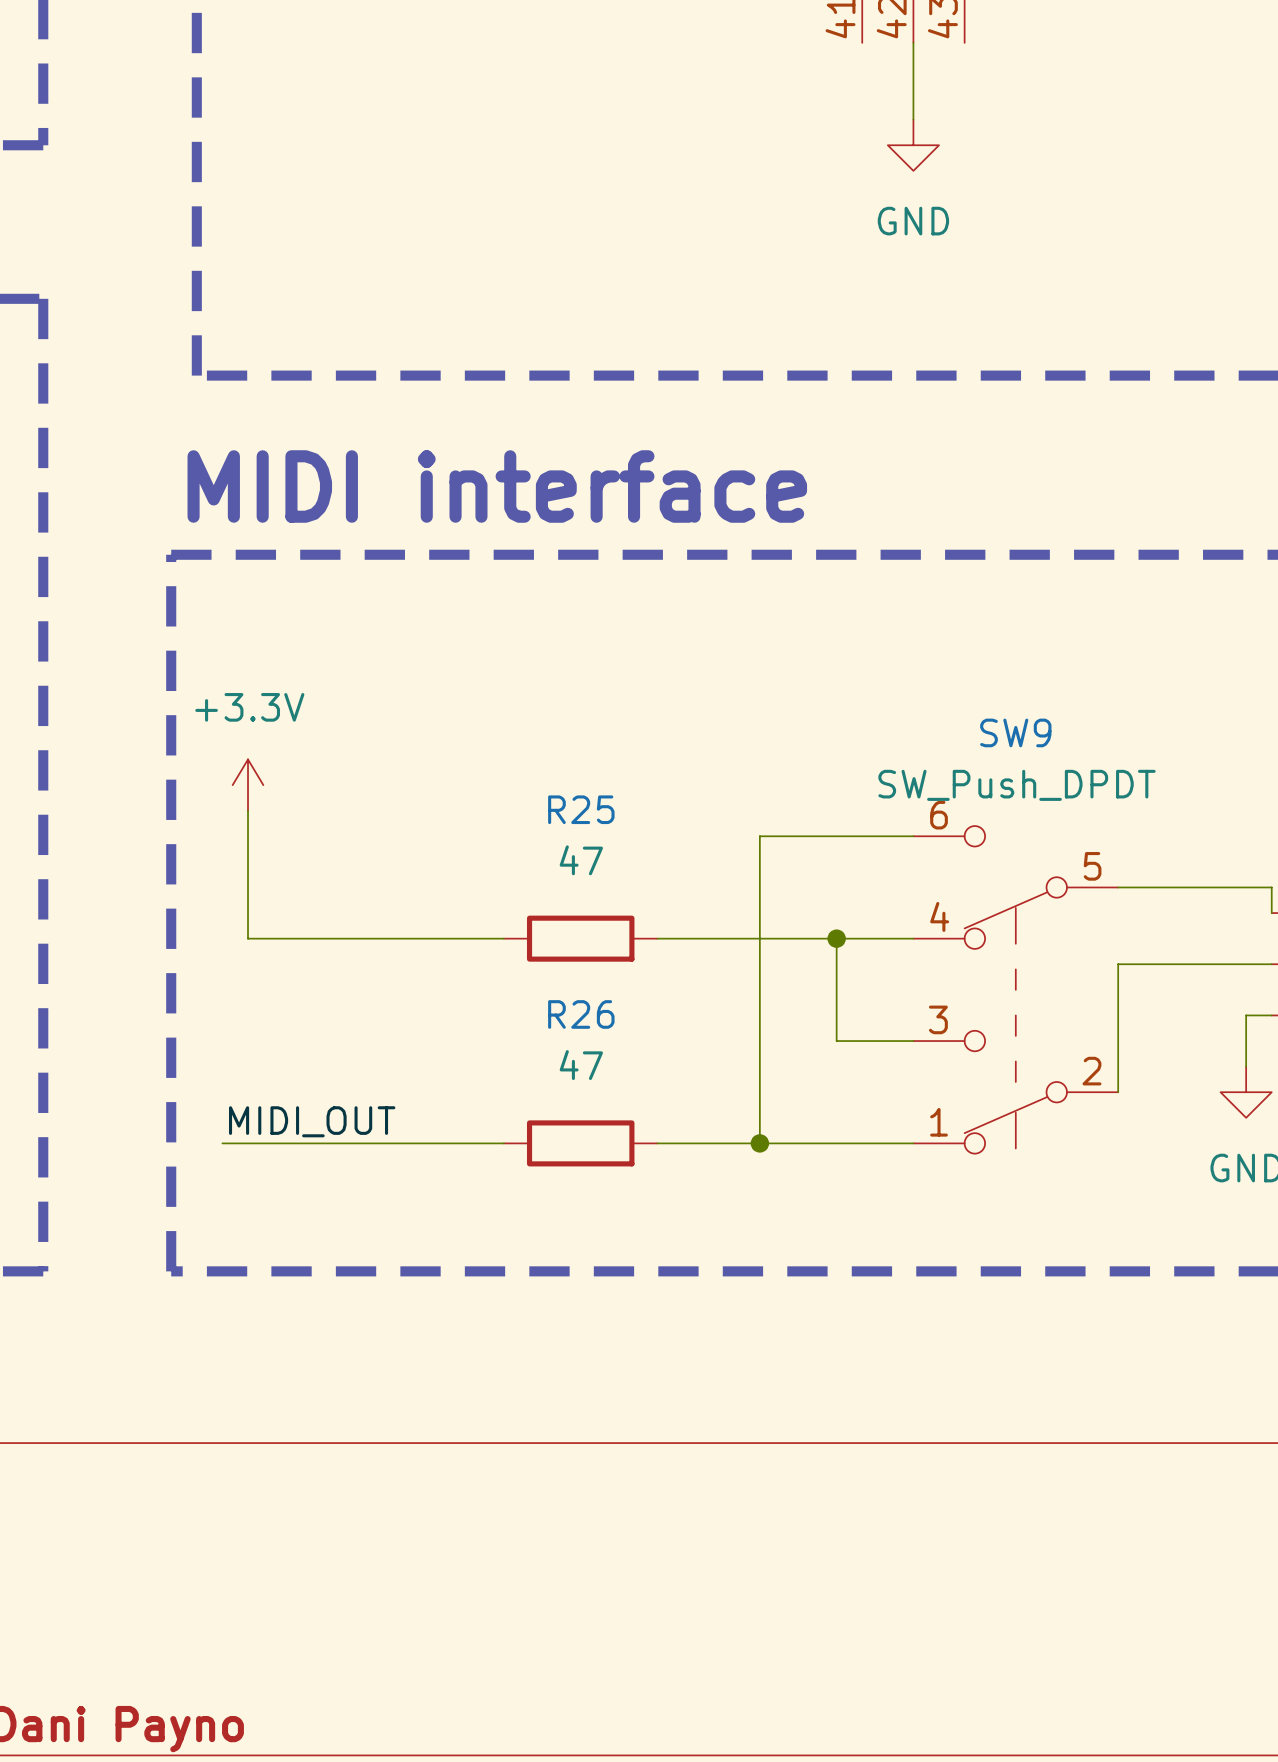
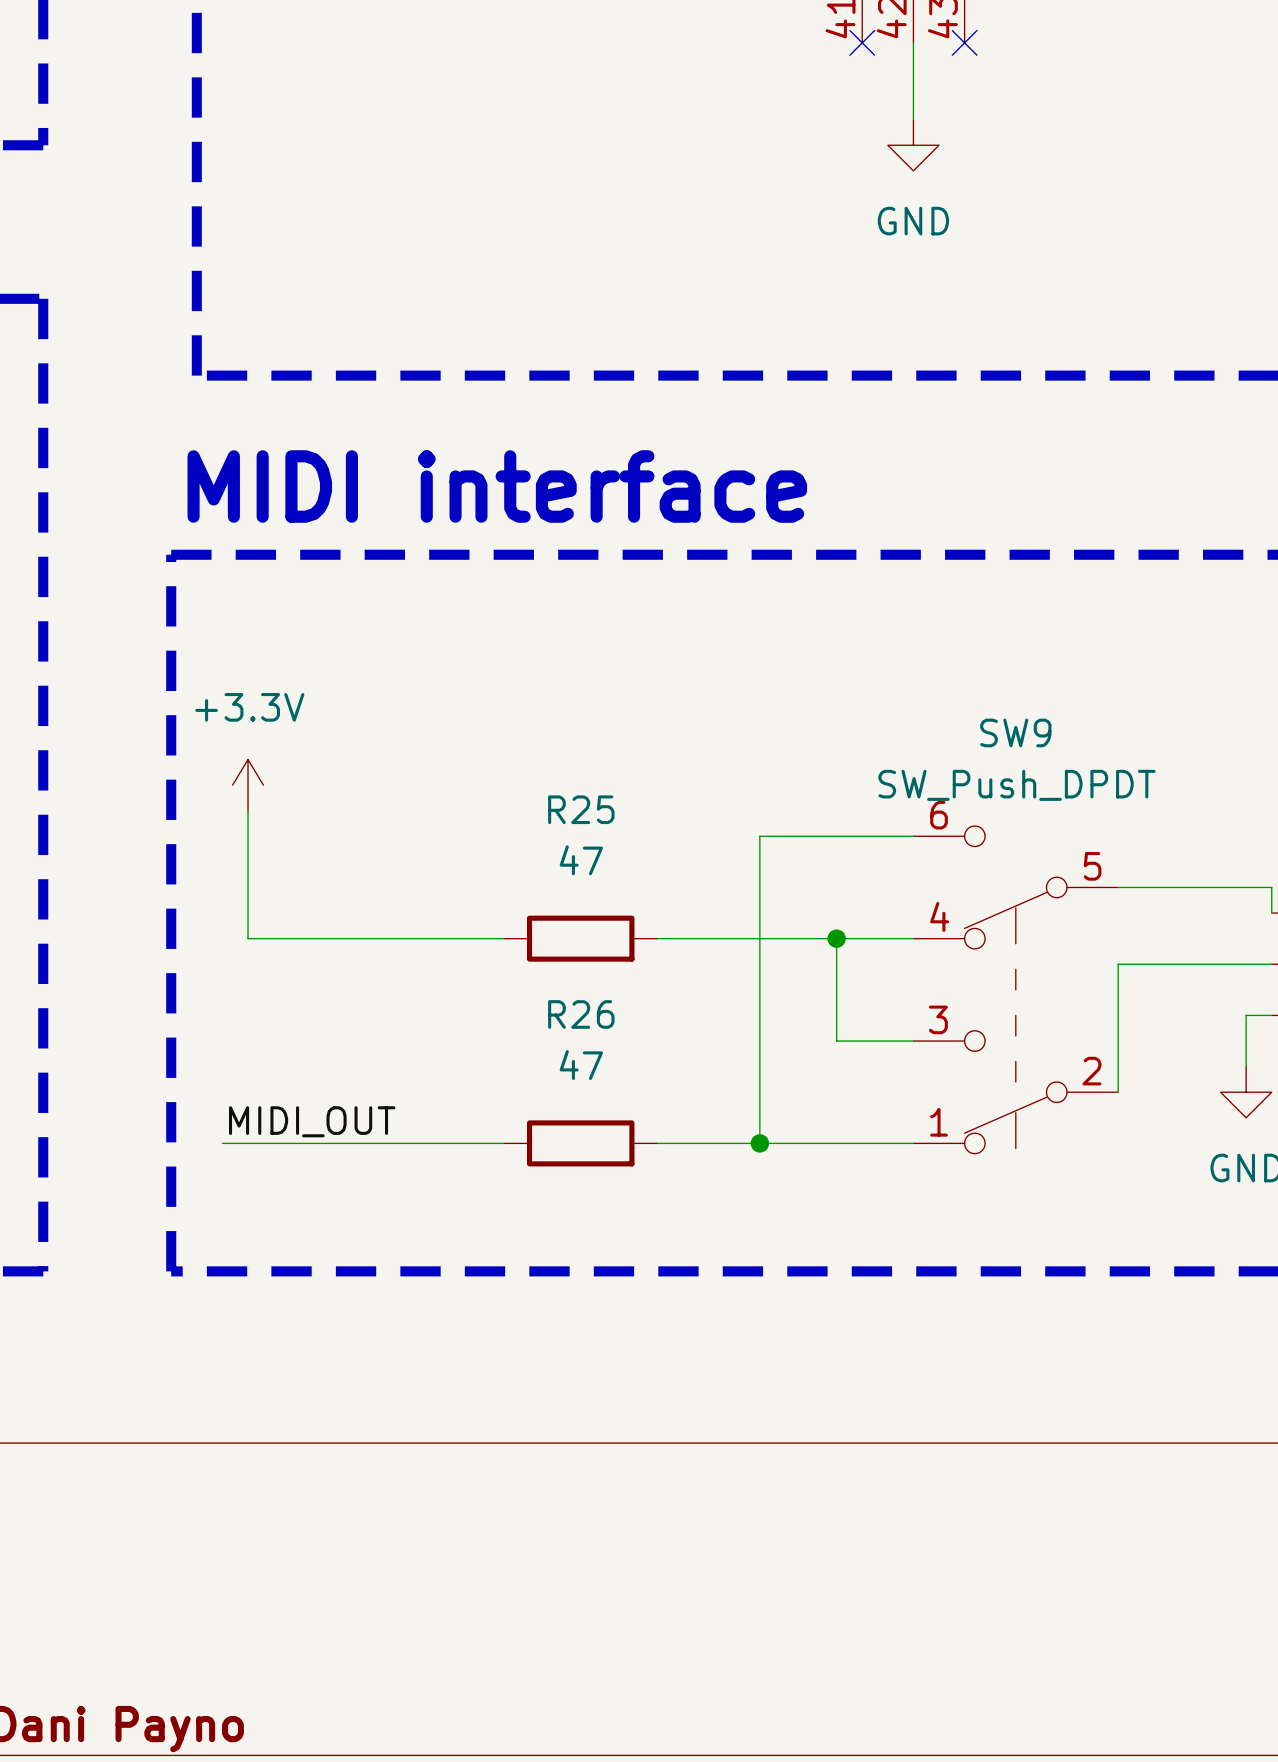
no-connect mark: none -> (862, 42)
no-connect mark: none -> (964, 42)

